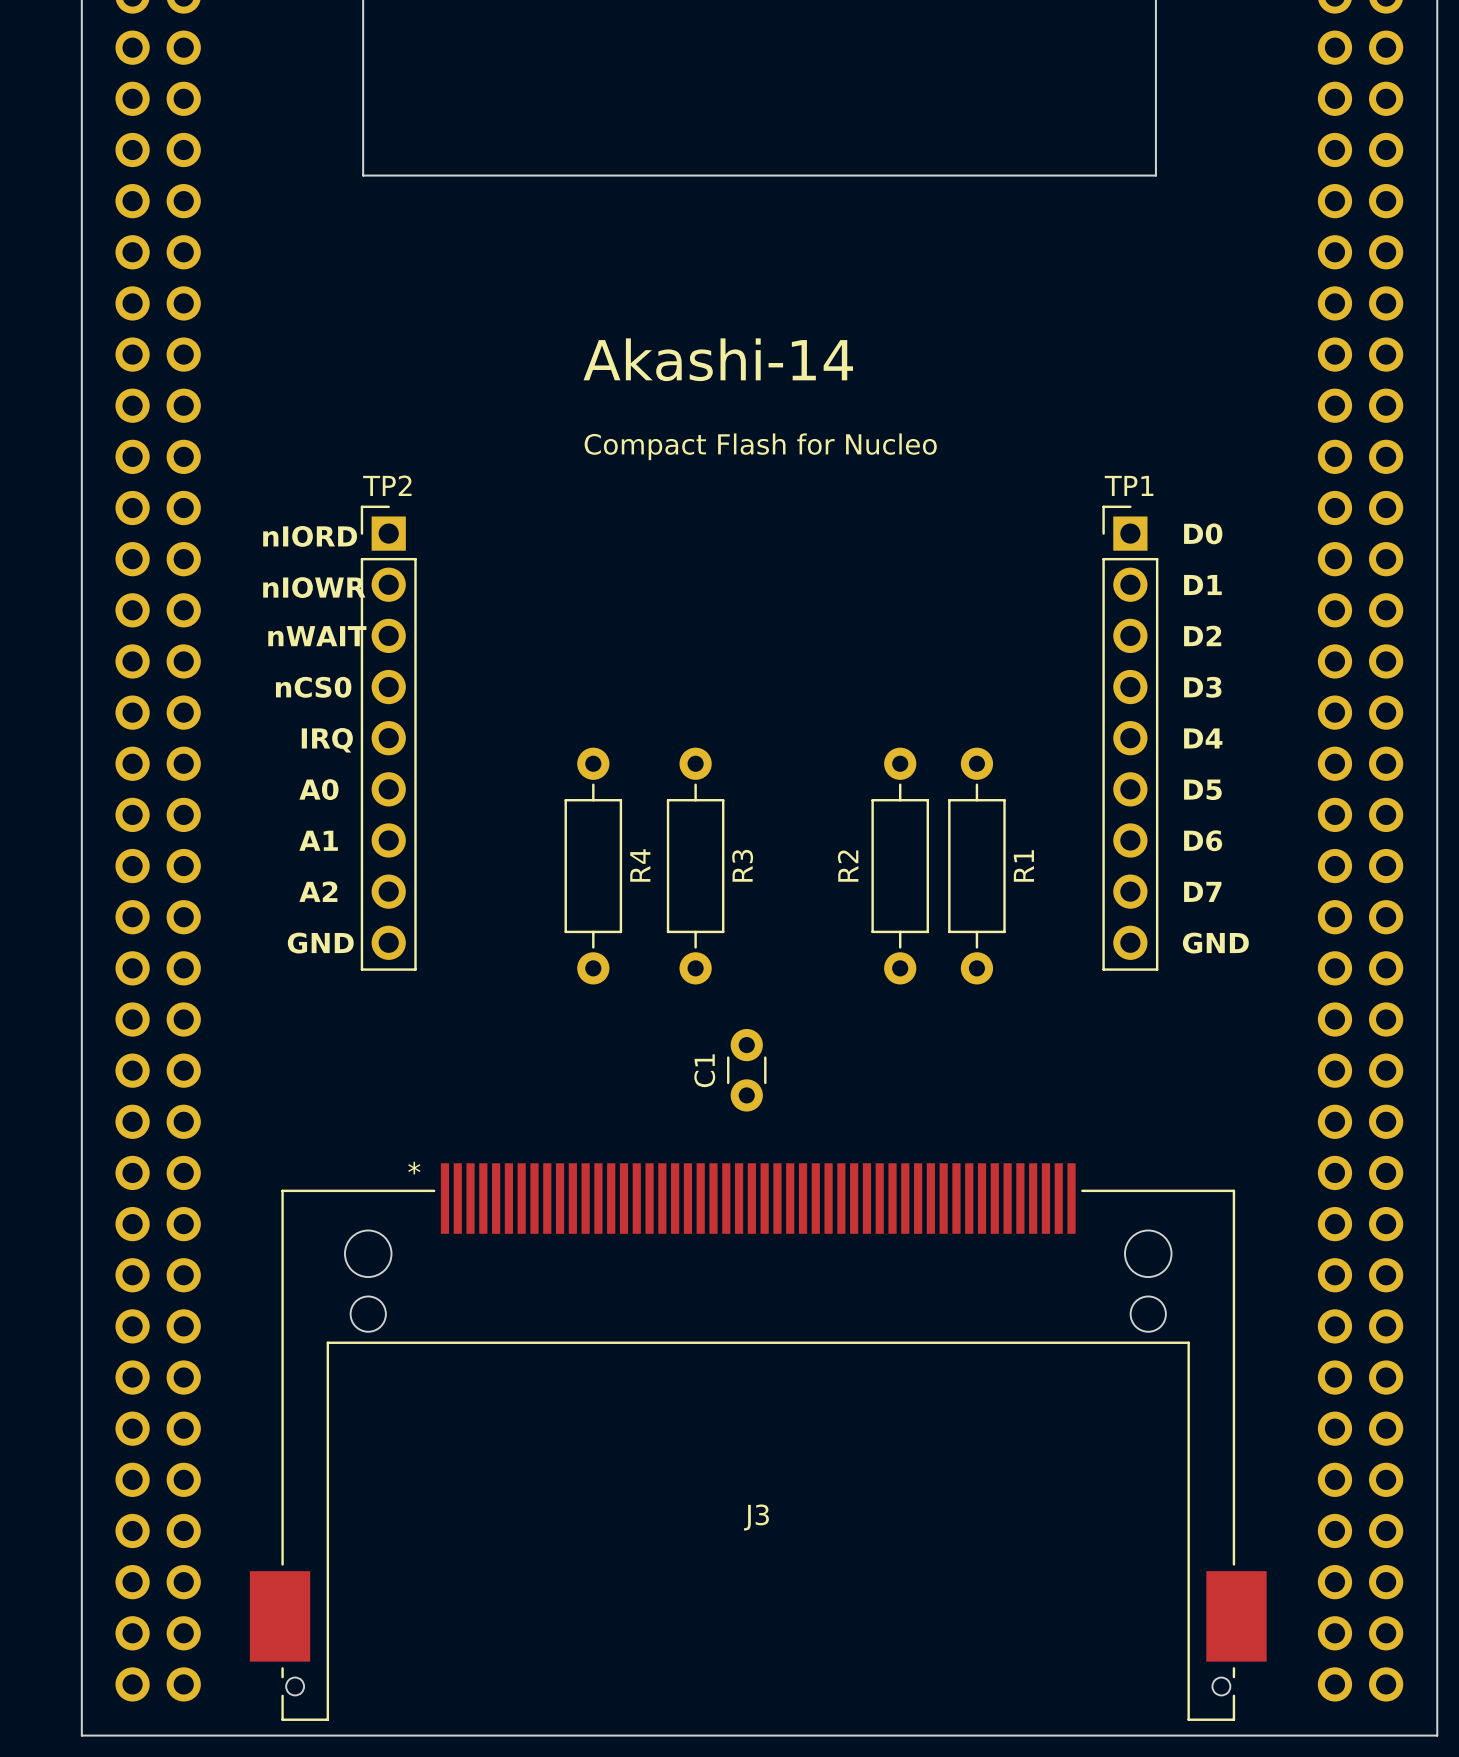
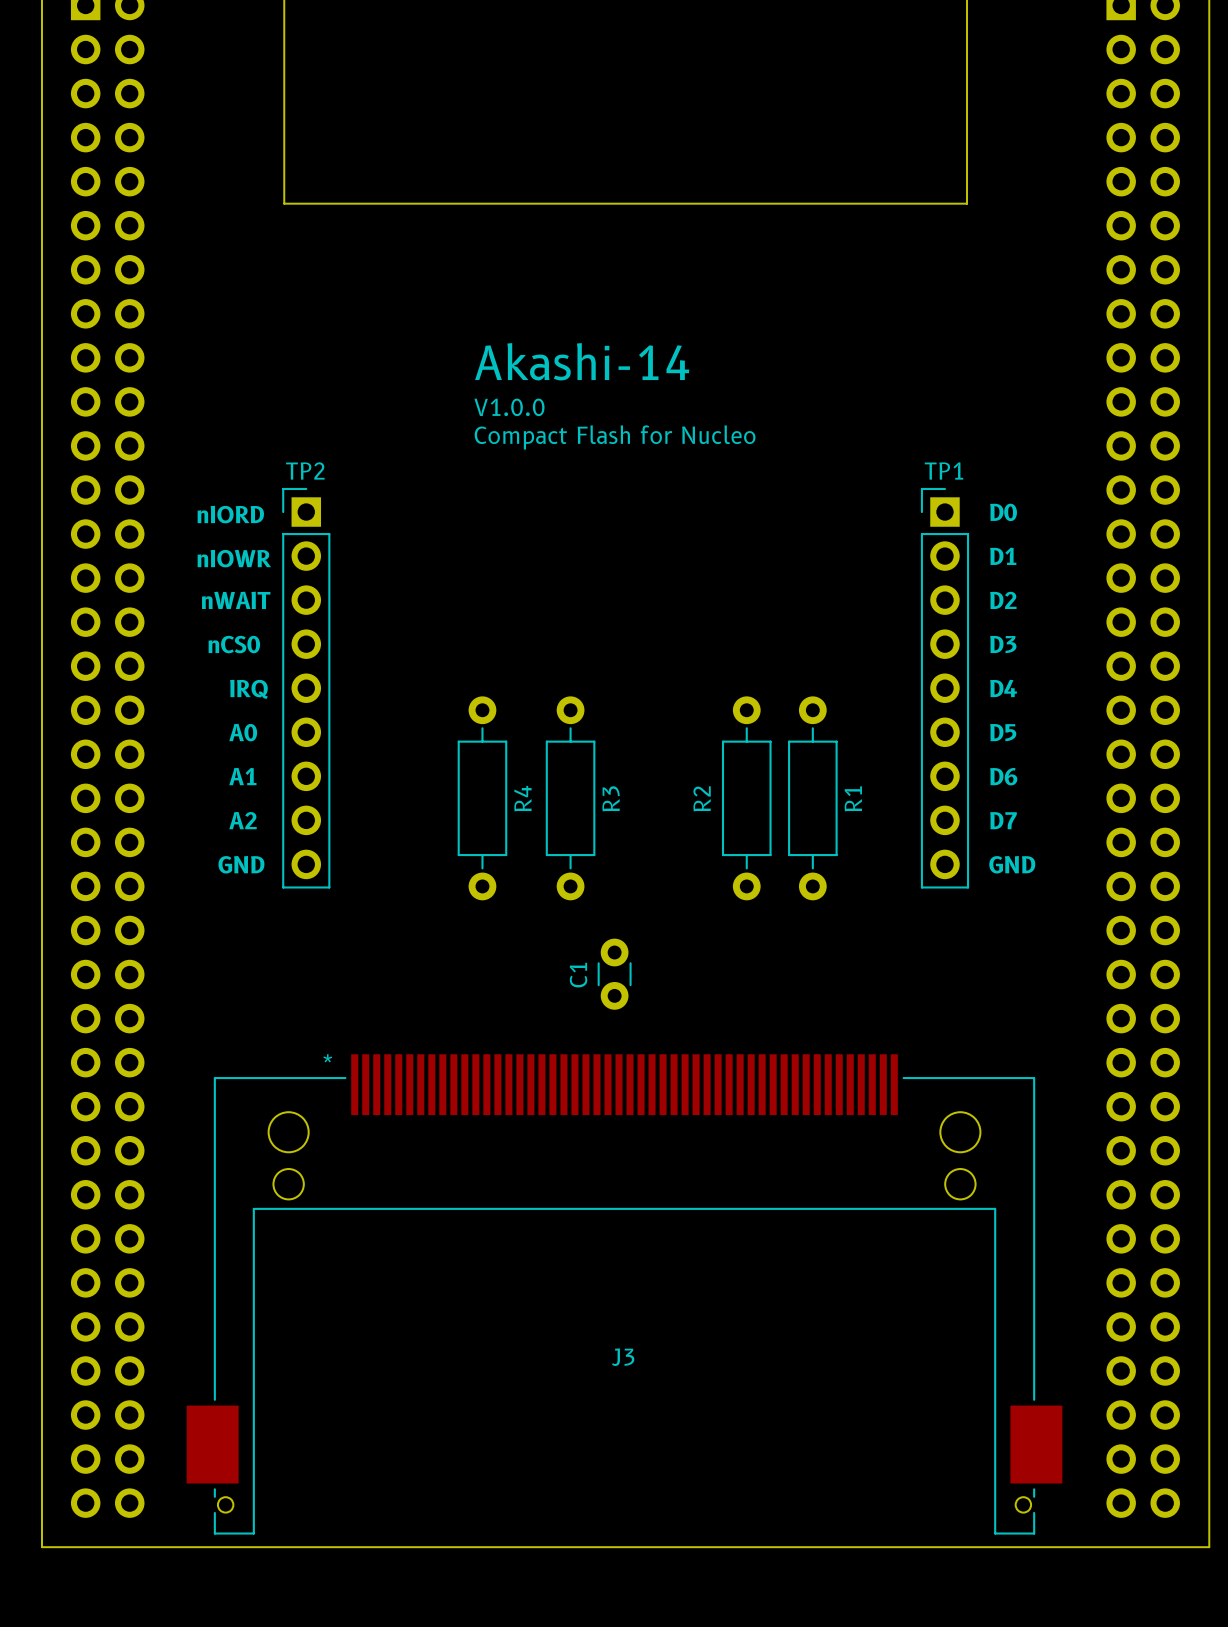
text: none -> V1.0.0 (509, 407)

